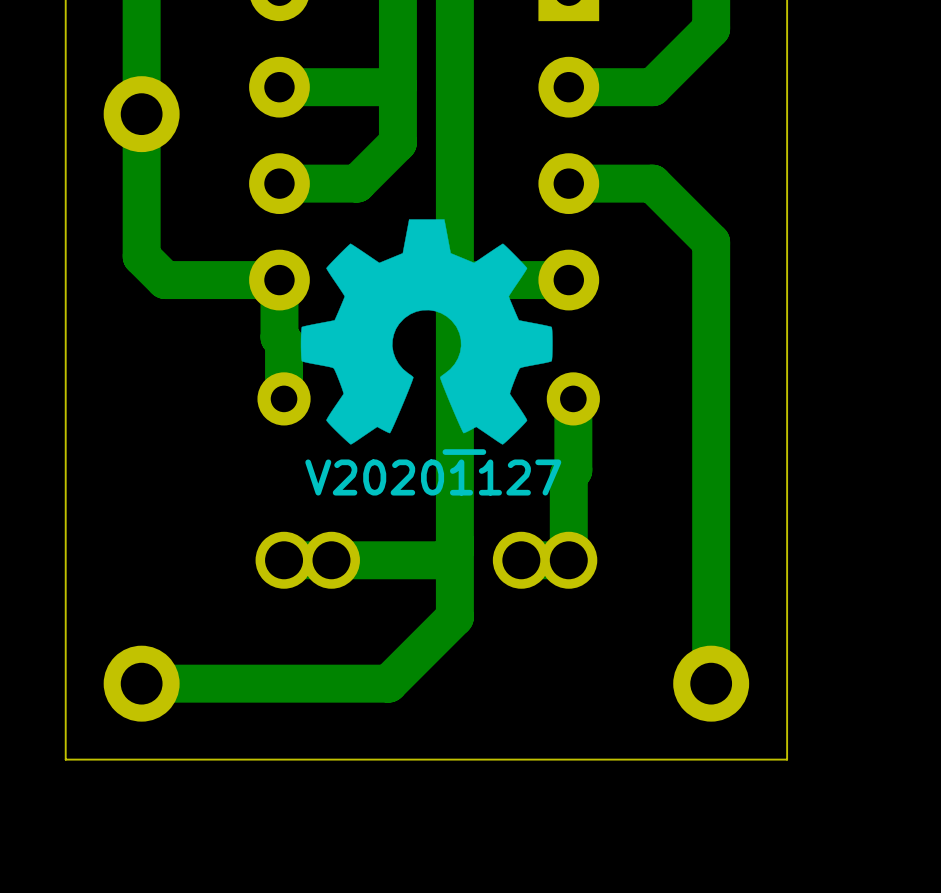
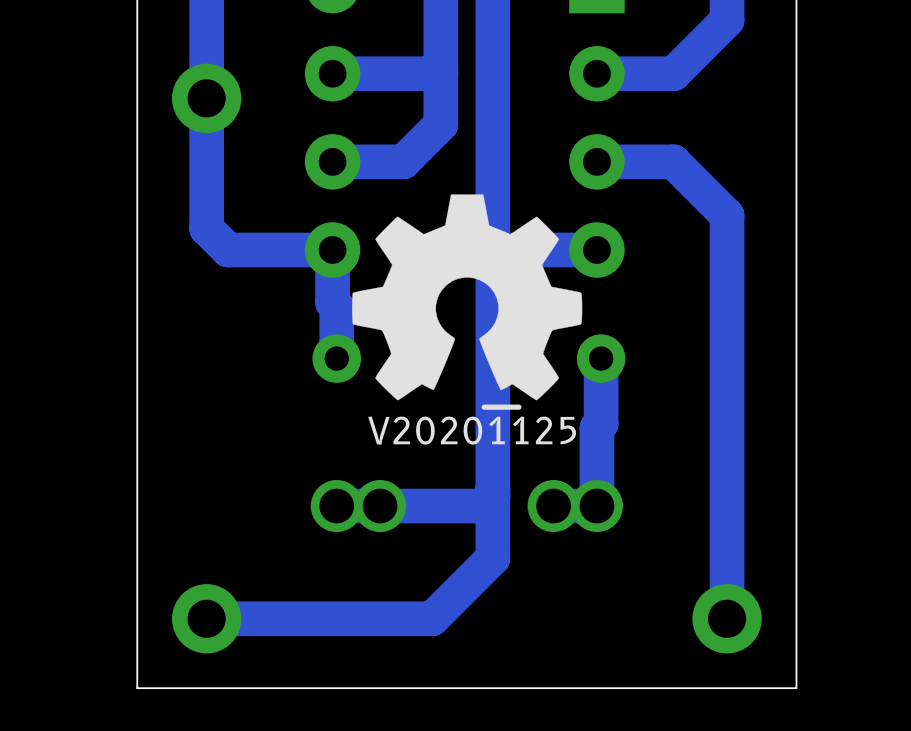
drawing shape: [305, 449, 562, 496] -> [368, 404, 577, 445]

